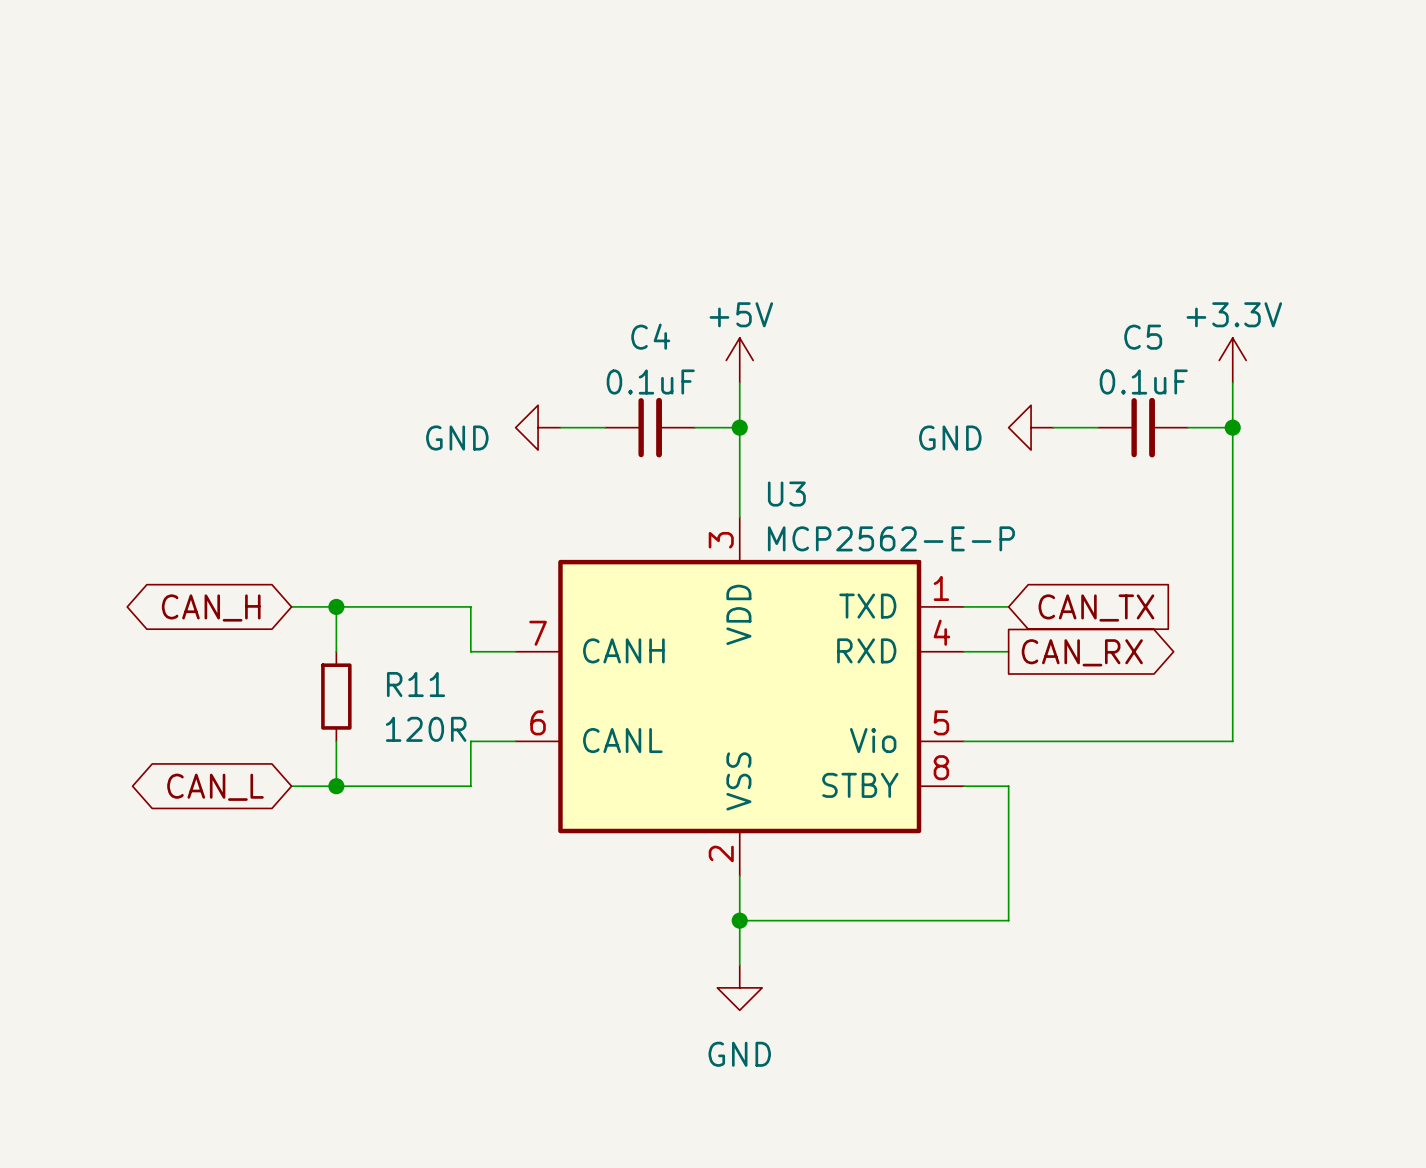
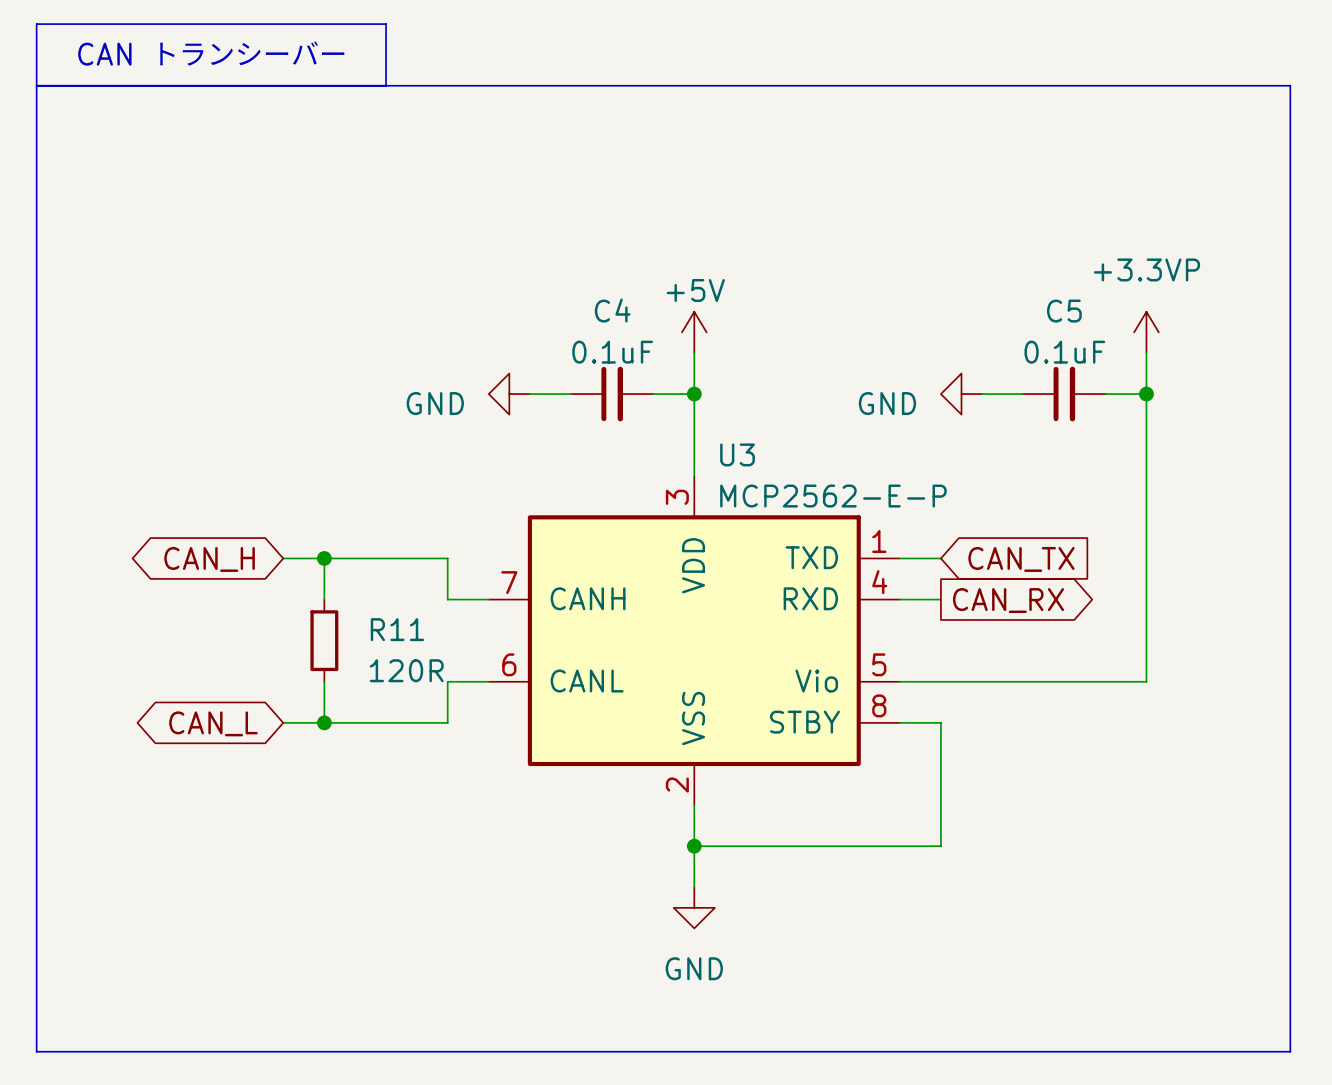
text: none -> CAN トランシーバー (211, 53)
line: none -> (36, 85) (1290, 85) (1290, 1051) (36, 1051) (36, 24) (386, 24) (386, 85)
power symbol: +3.3V (1232, 360) -> +3.3VP (1146, 332)

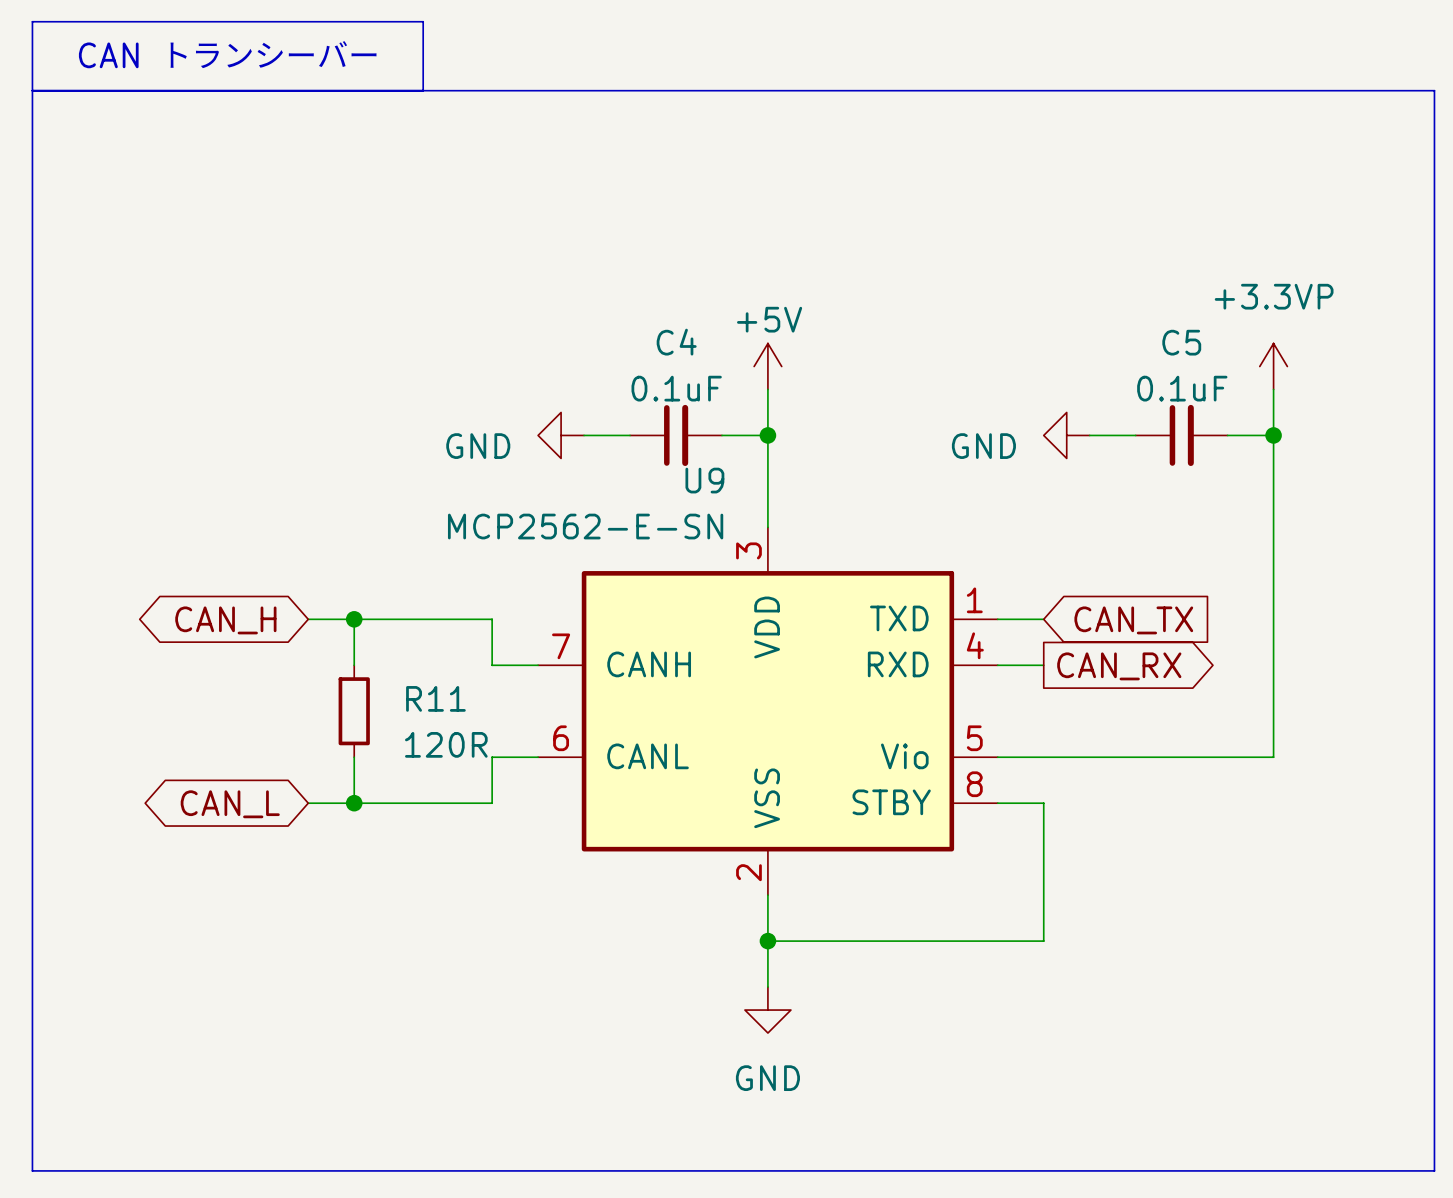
U3 name: U3 (737, 454) -> U9 (704, 480)
U3 value: MCP2562-E-P (833, 496) -> MCP2562-E-SN (585, 526)

